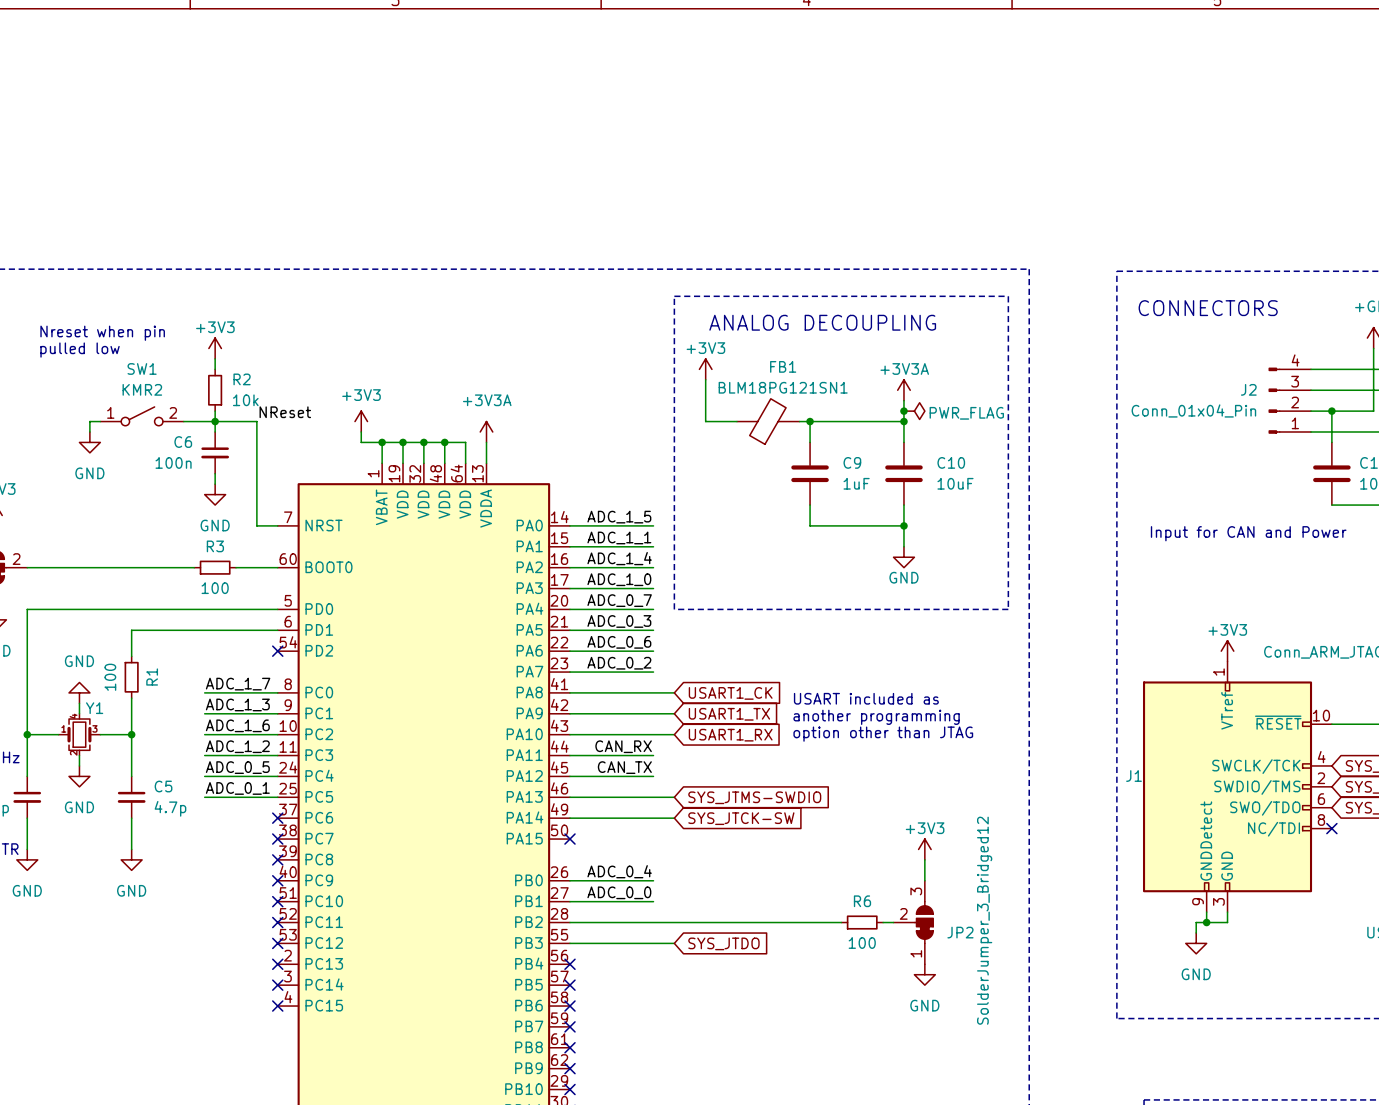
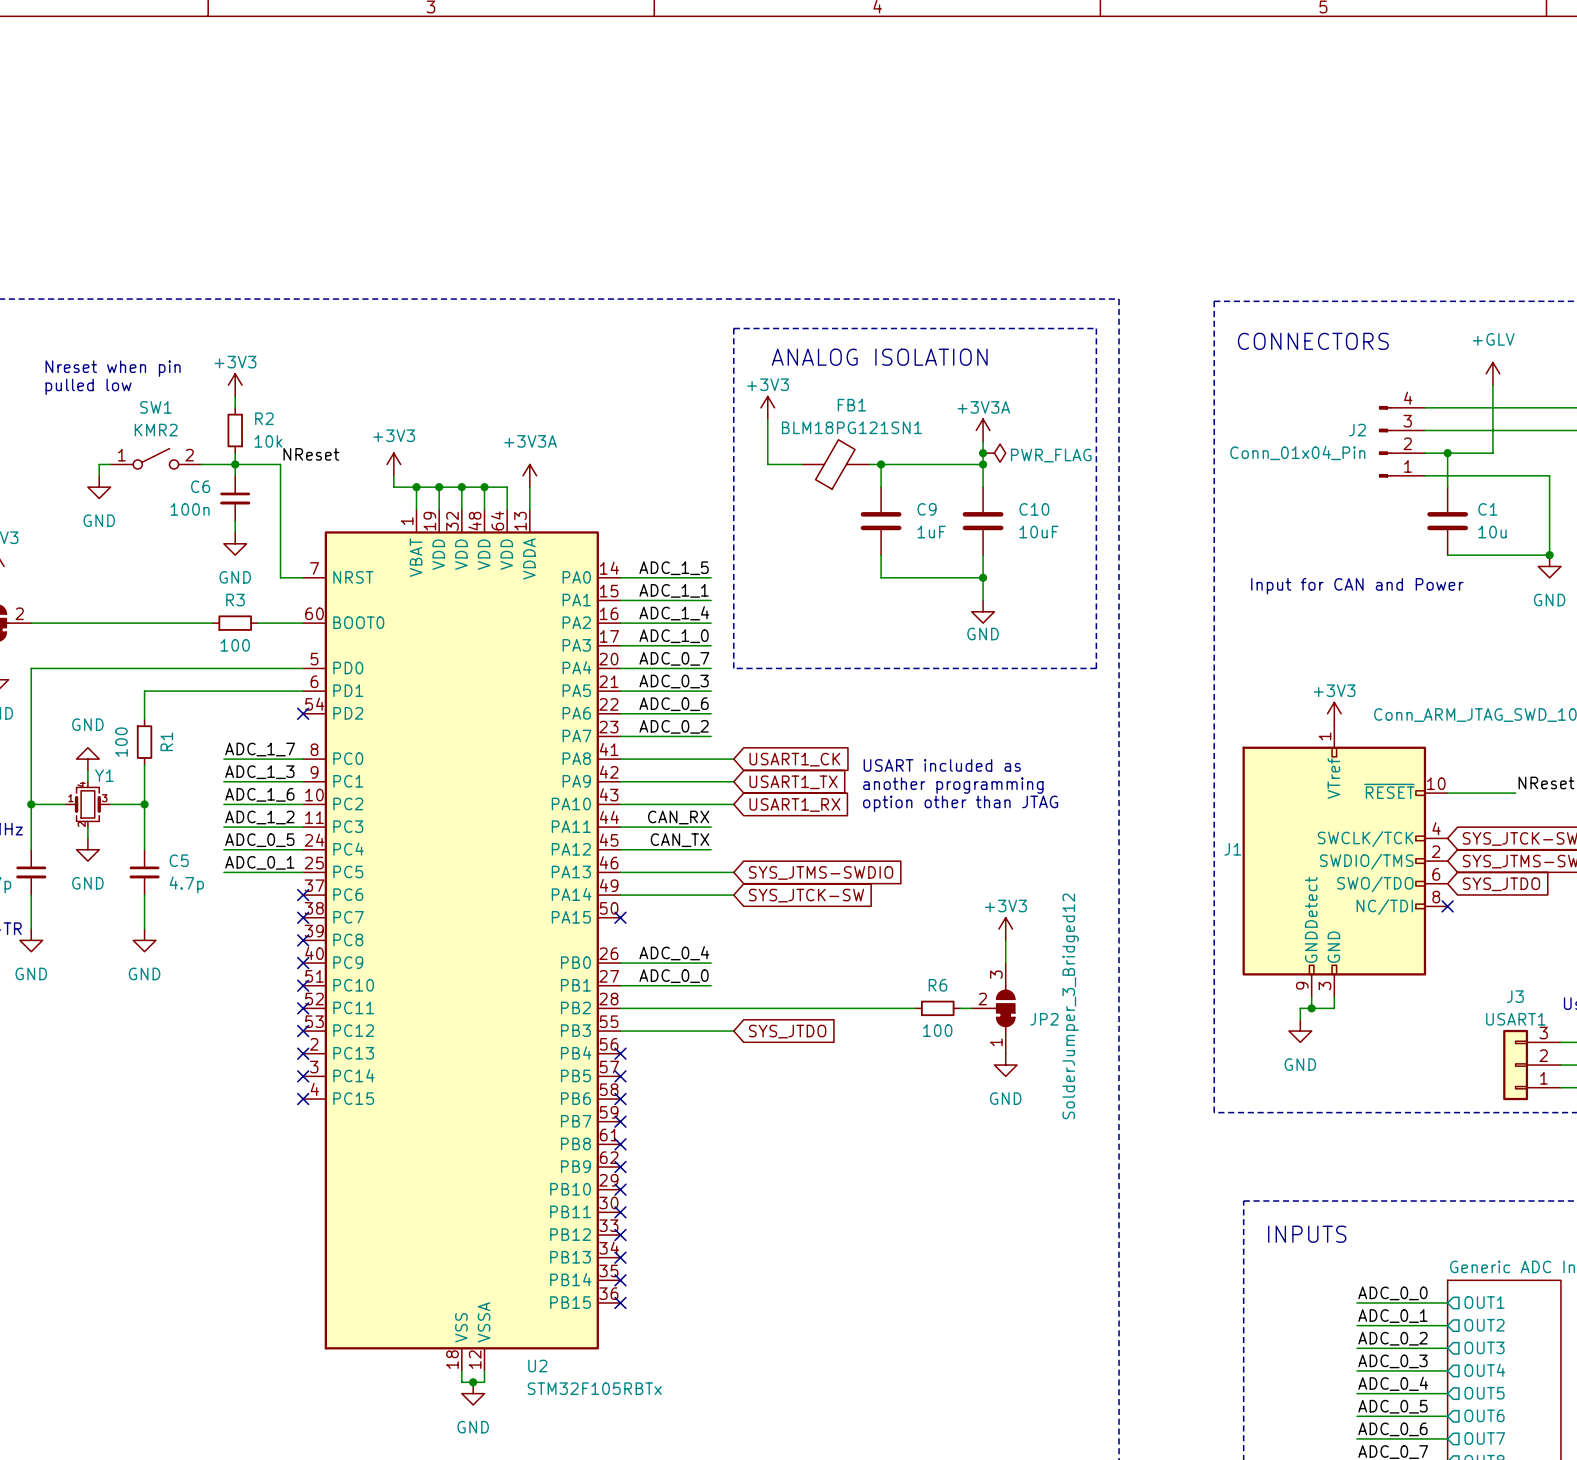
text: ANALOG DECOUPLING (822, 322) -> ANALOG ISOLATION (879, 357)

